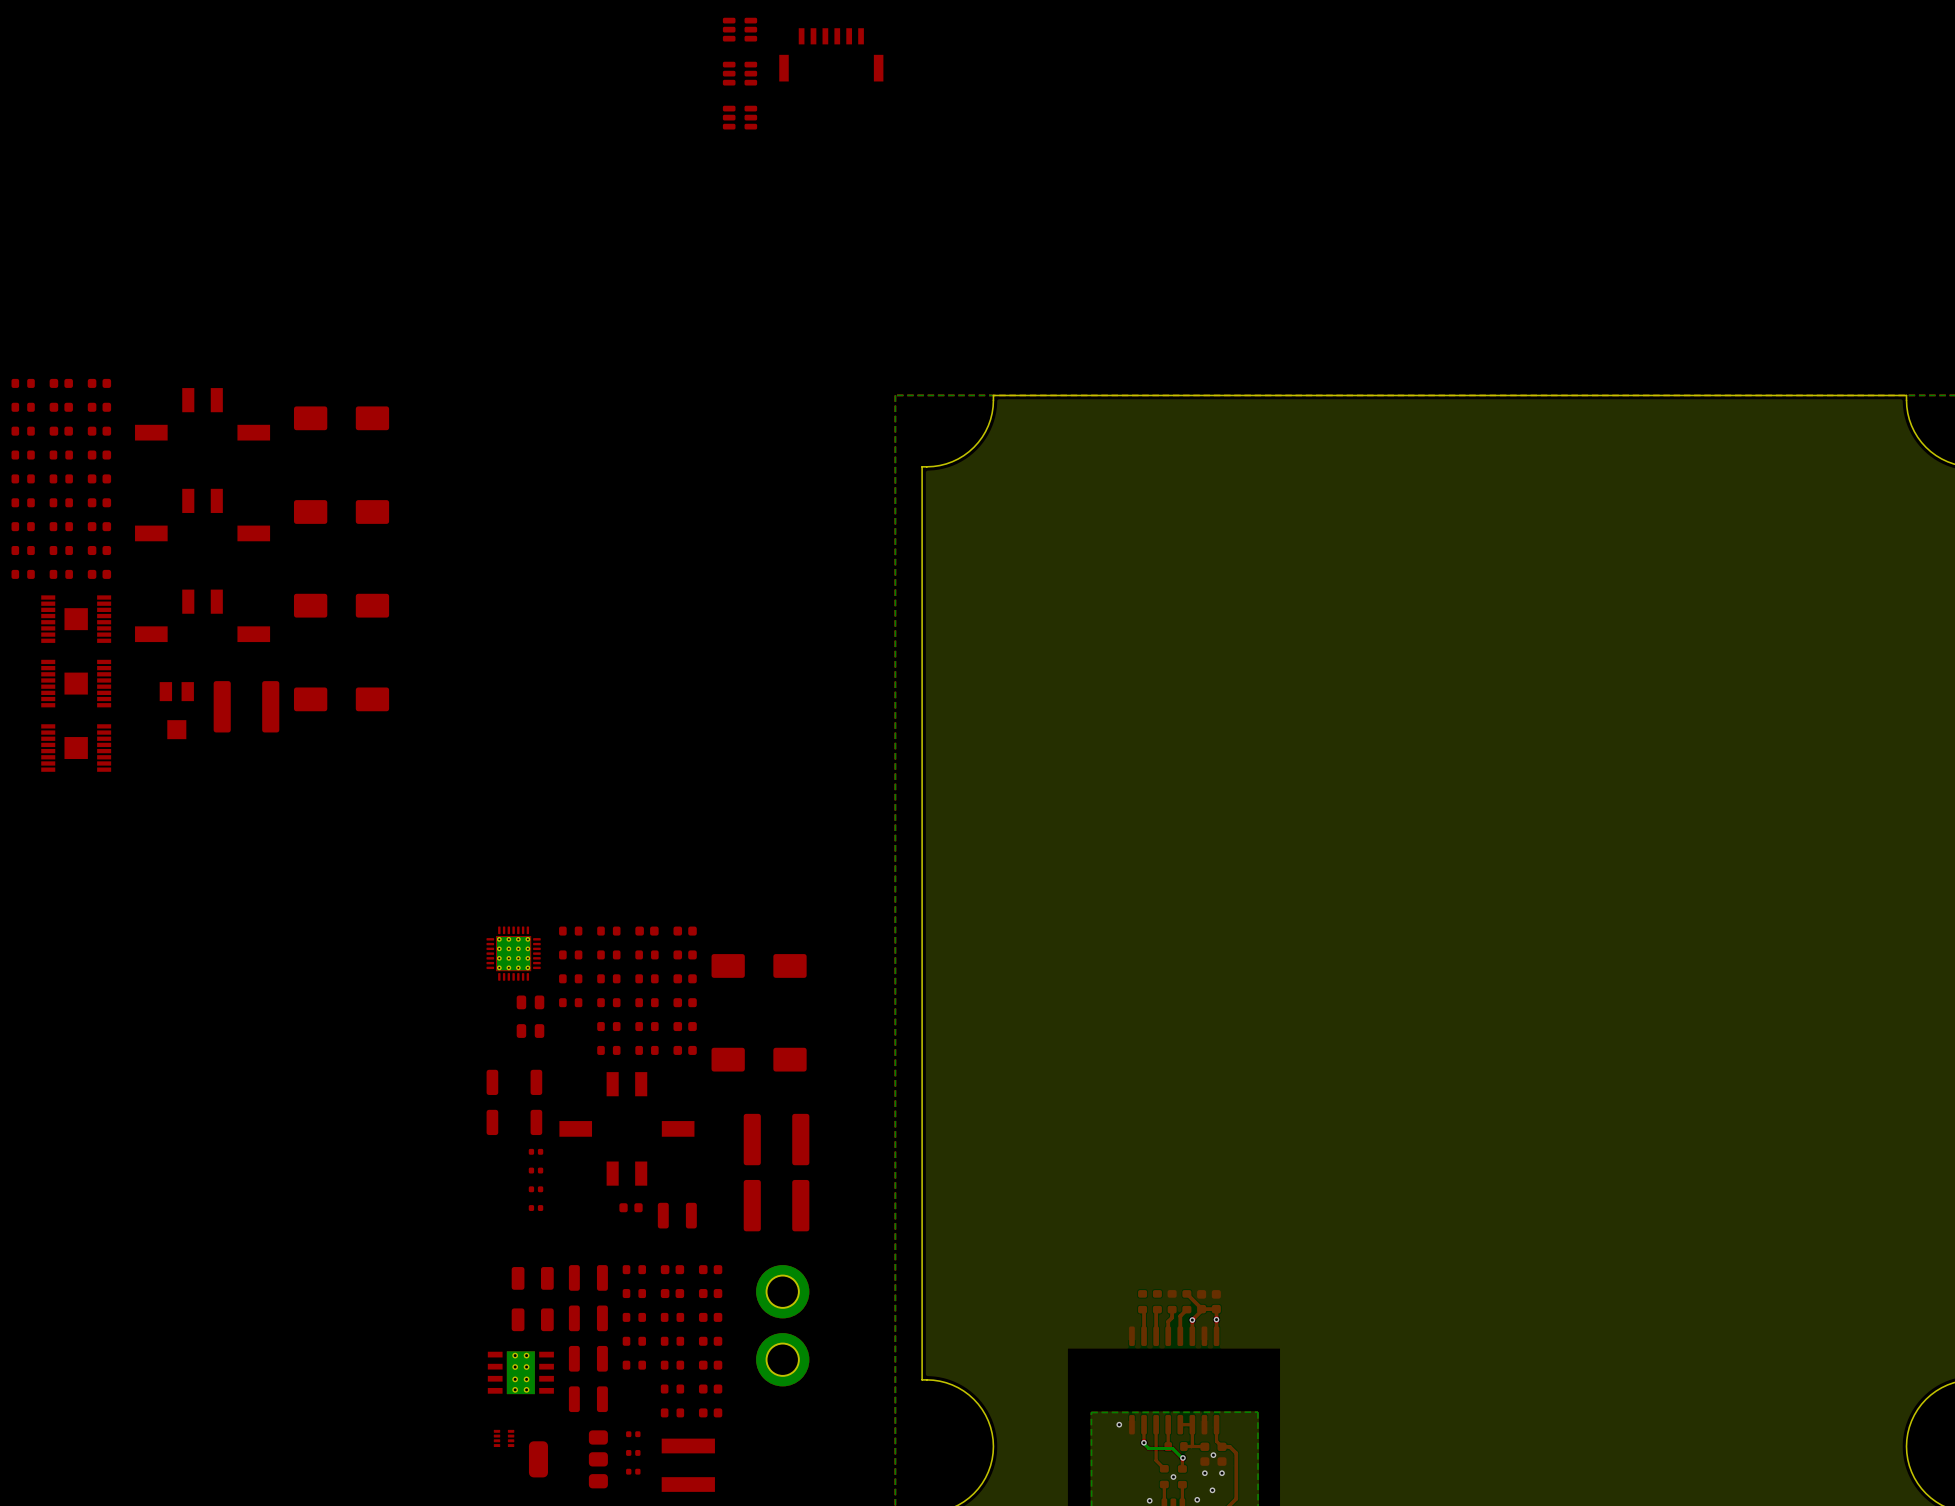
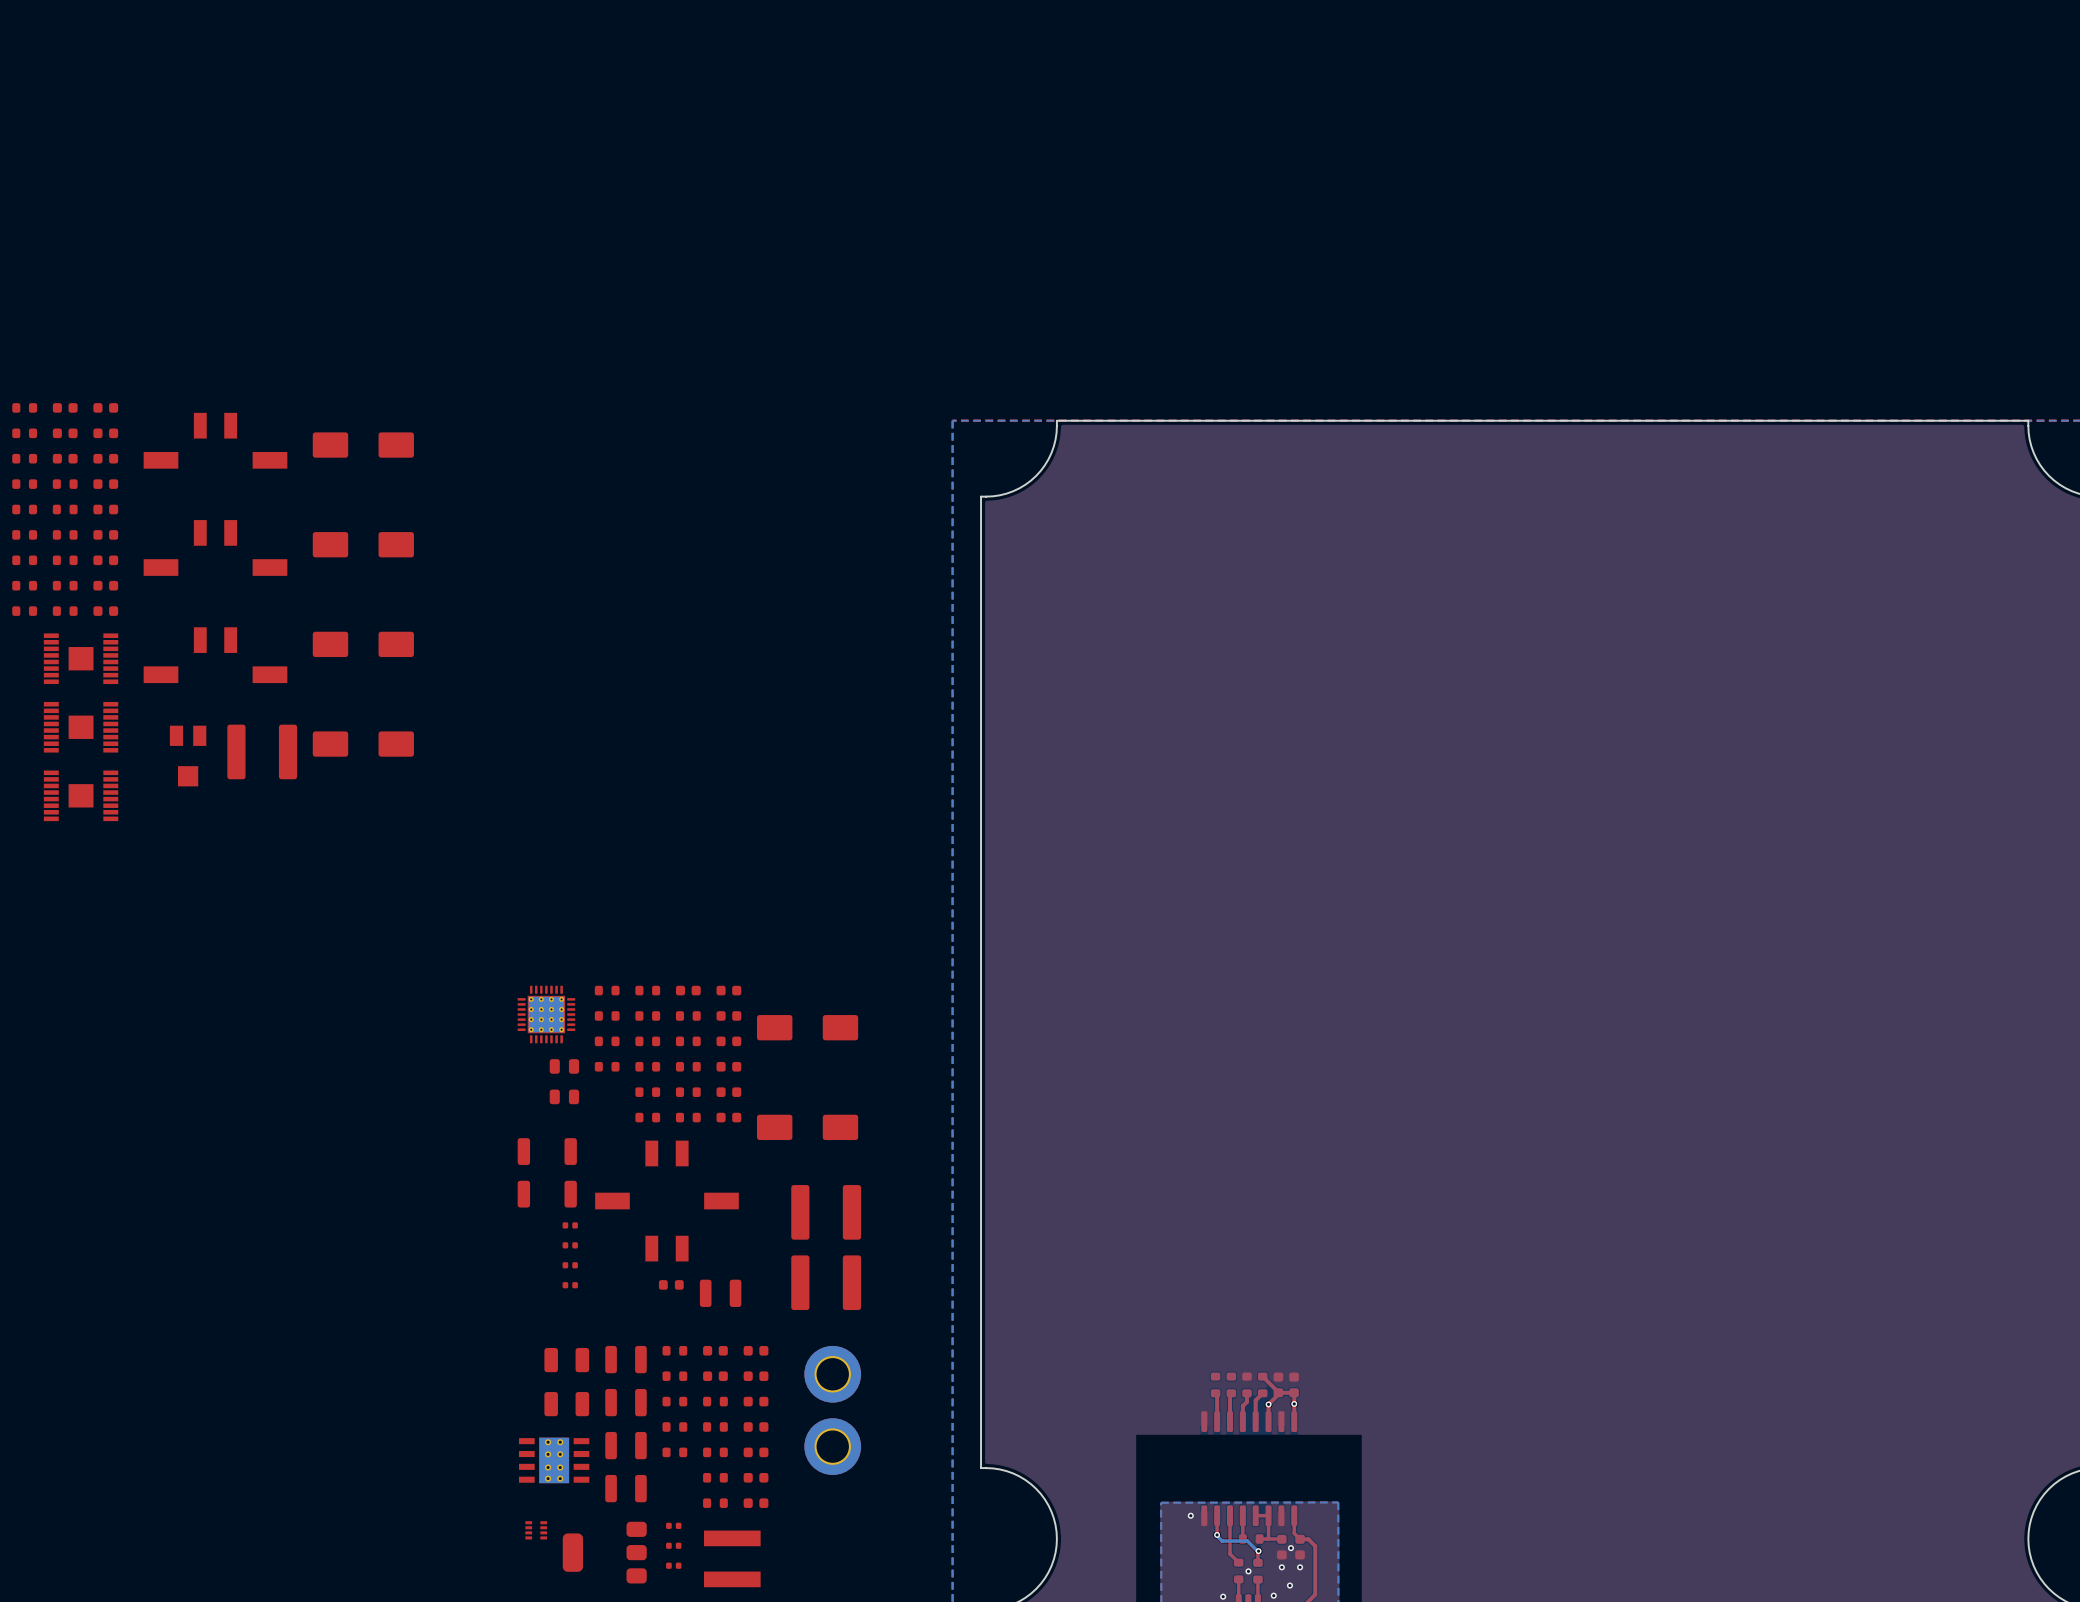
part: (740, 29) -> none
part: (831, 54) -> none
part: (740, 73) -> none
part: (740, 117) -> none

